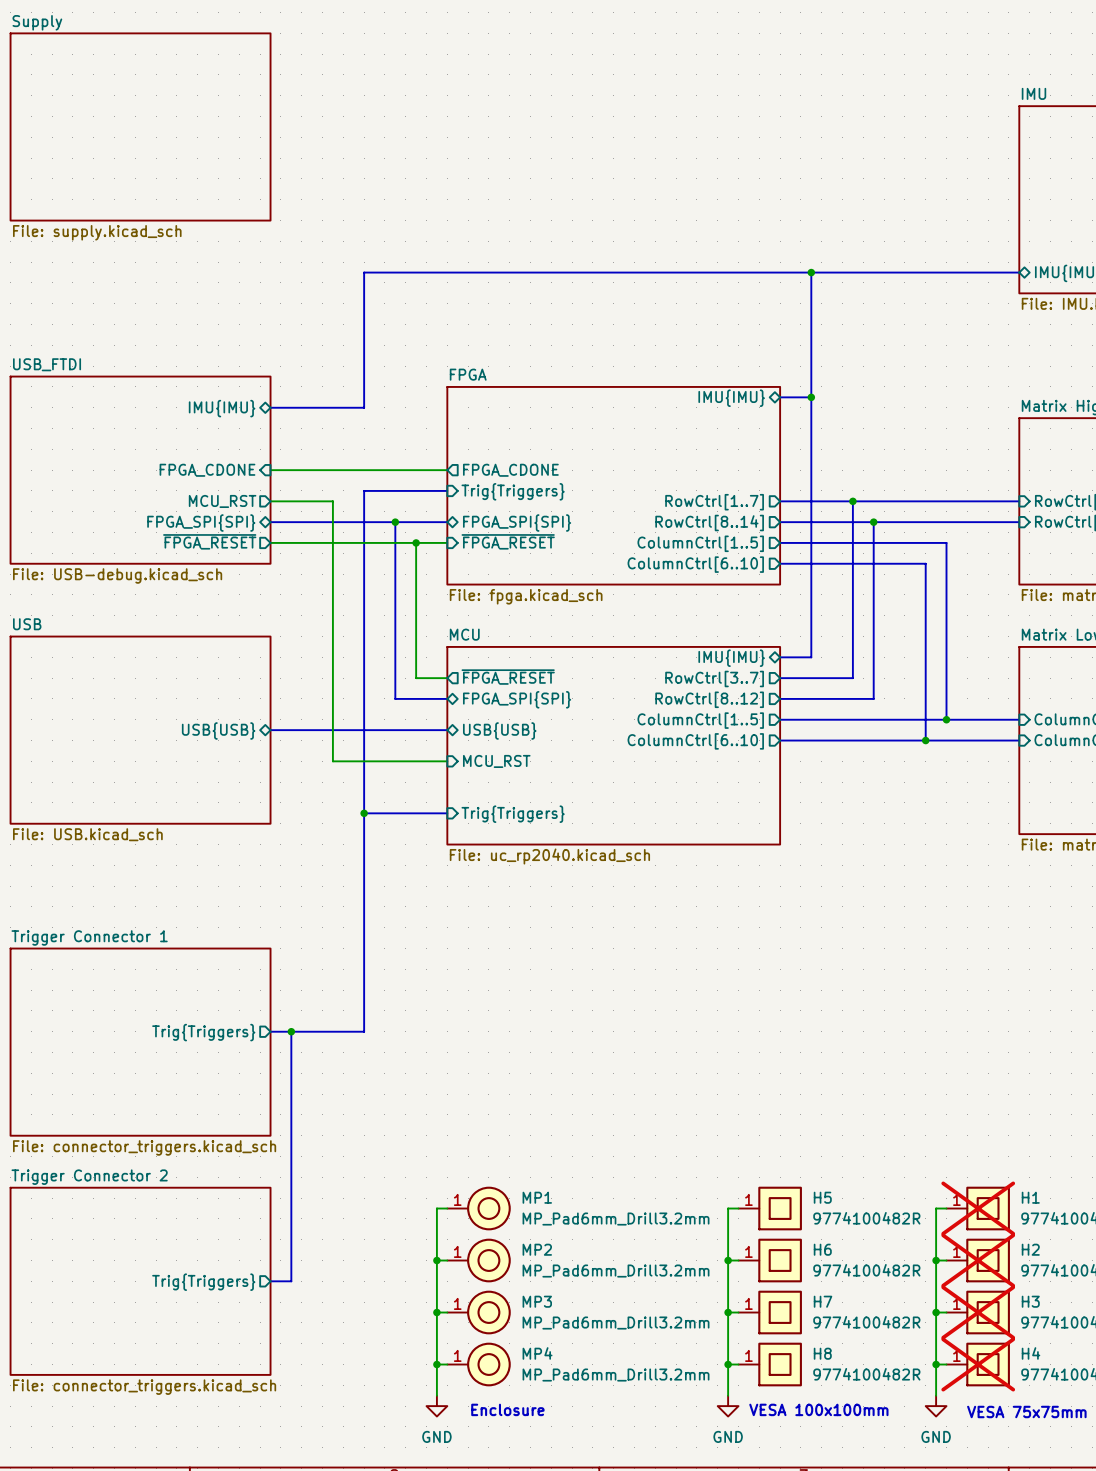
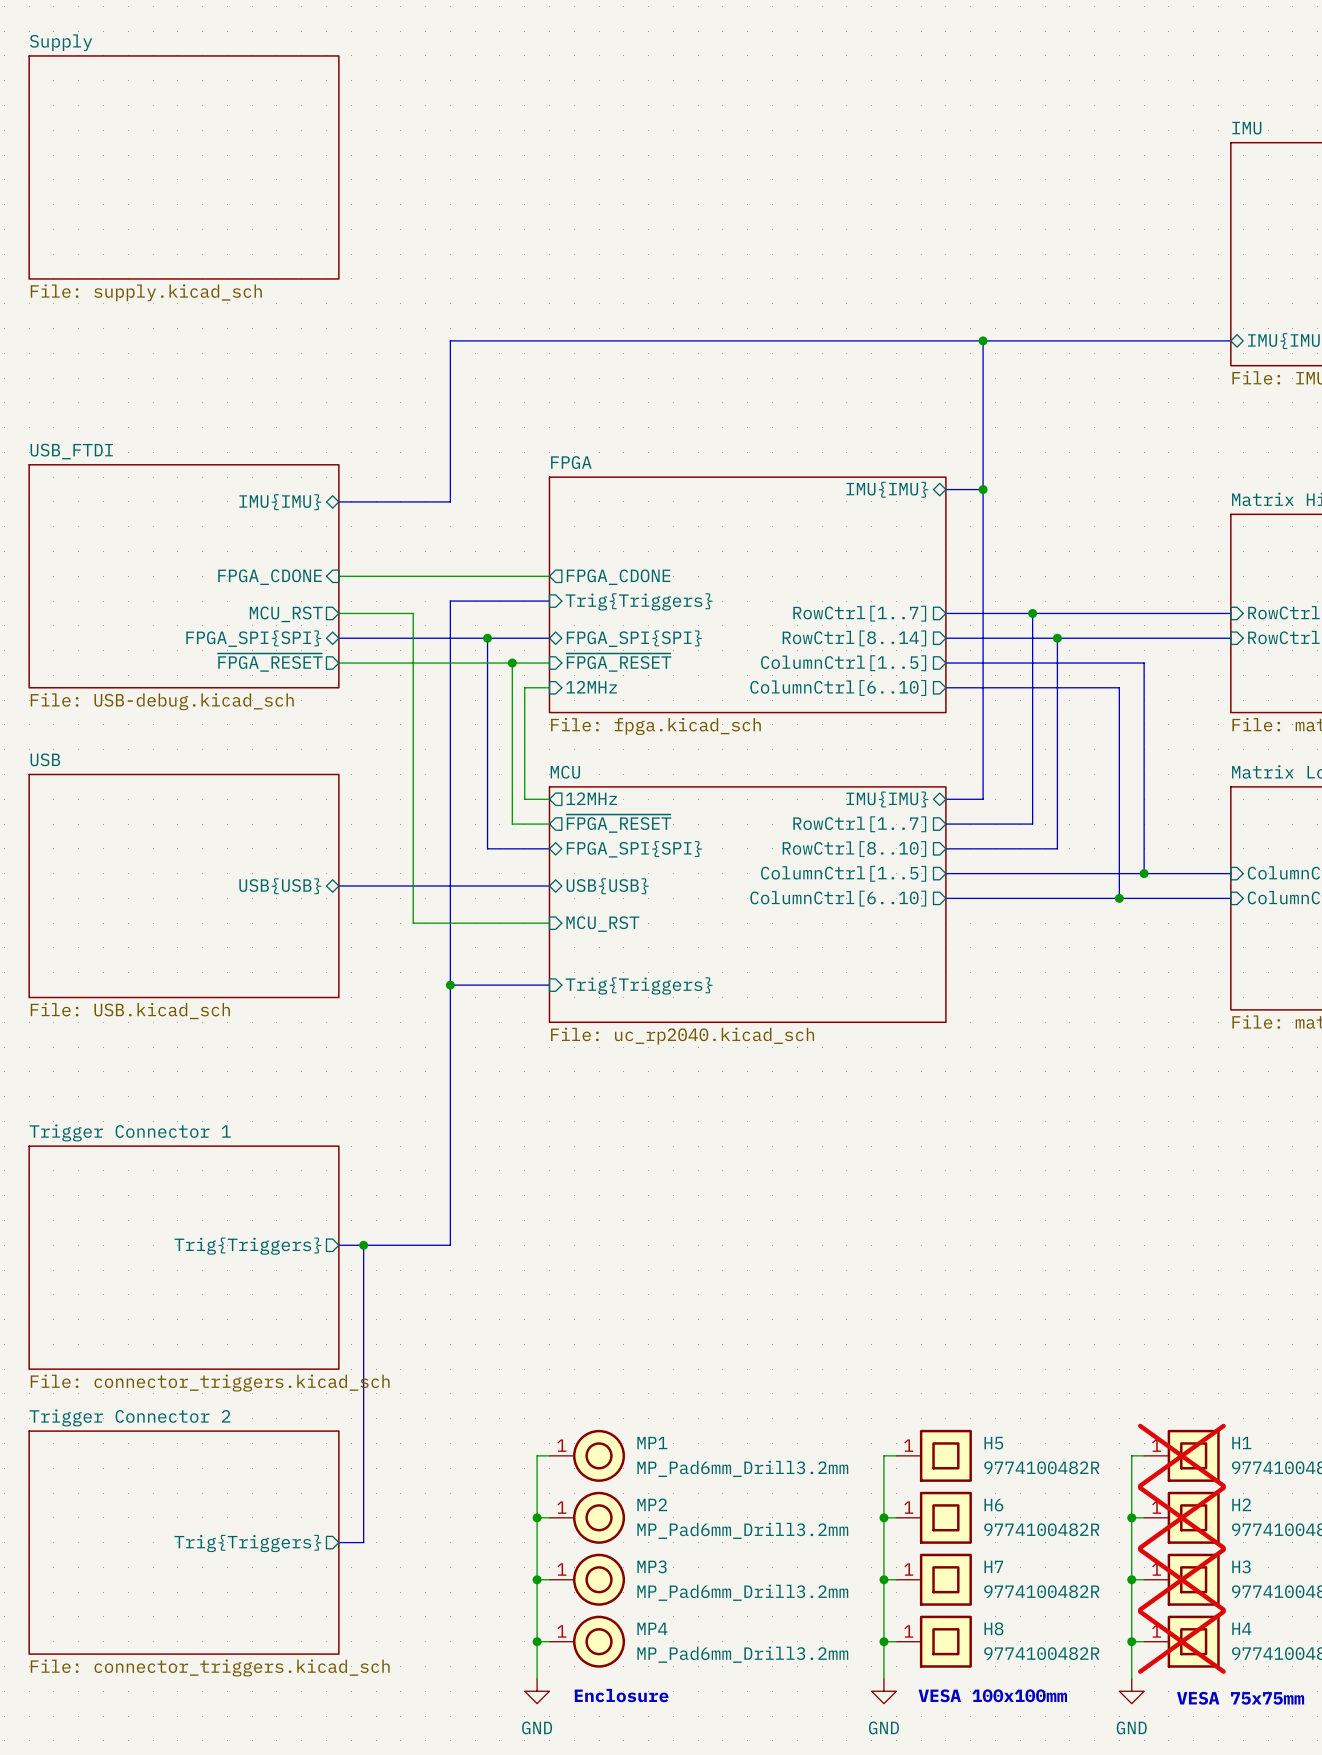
wire: none -> (549, 687) (524, 687) (524, 799) (549, 799)
sheet pin: none -> 12MHz (591, 687)
sheet pin: none -> 12MHz (591, 798)
sheet pin: RowCtrl[3..7] (714, 678) -> RowCtrl[1..7] (859, 824)
sheet pin: RowCtrl[8..12] (709, 699) -> RowCtrl[8..10] (854, 849)

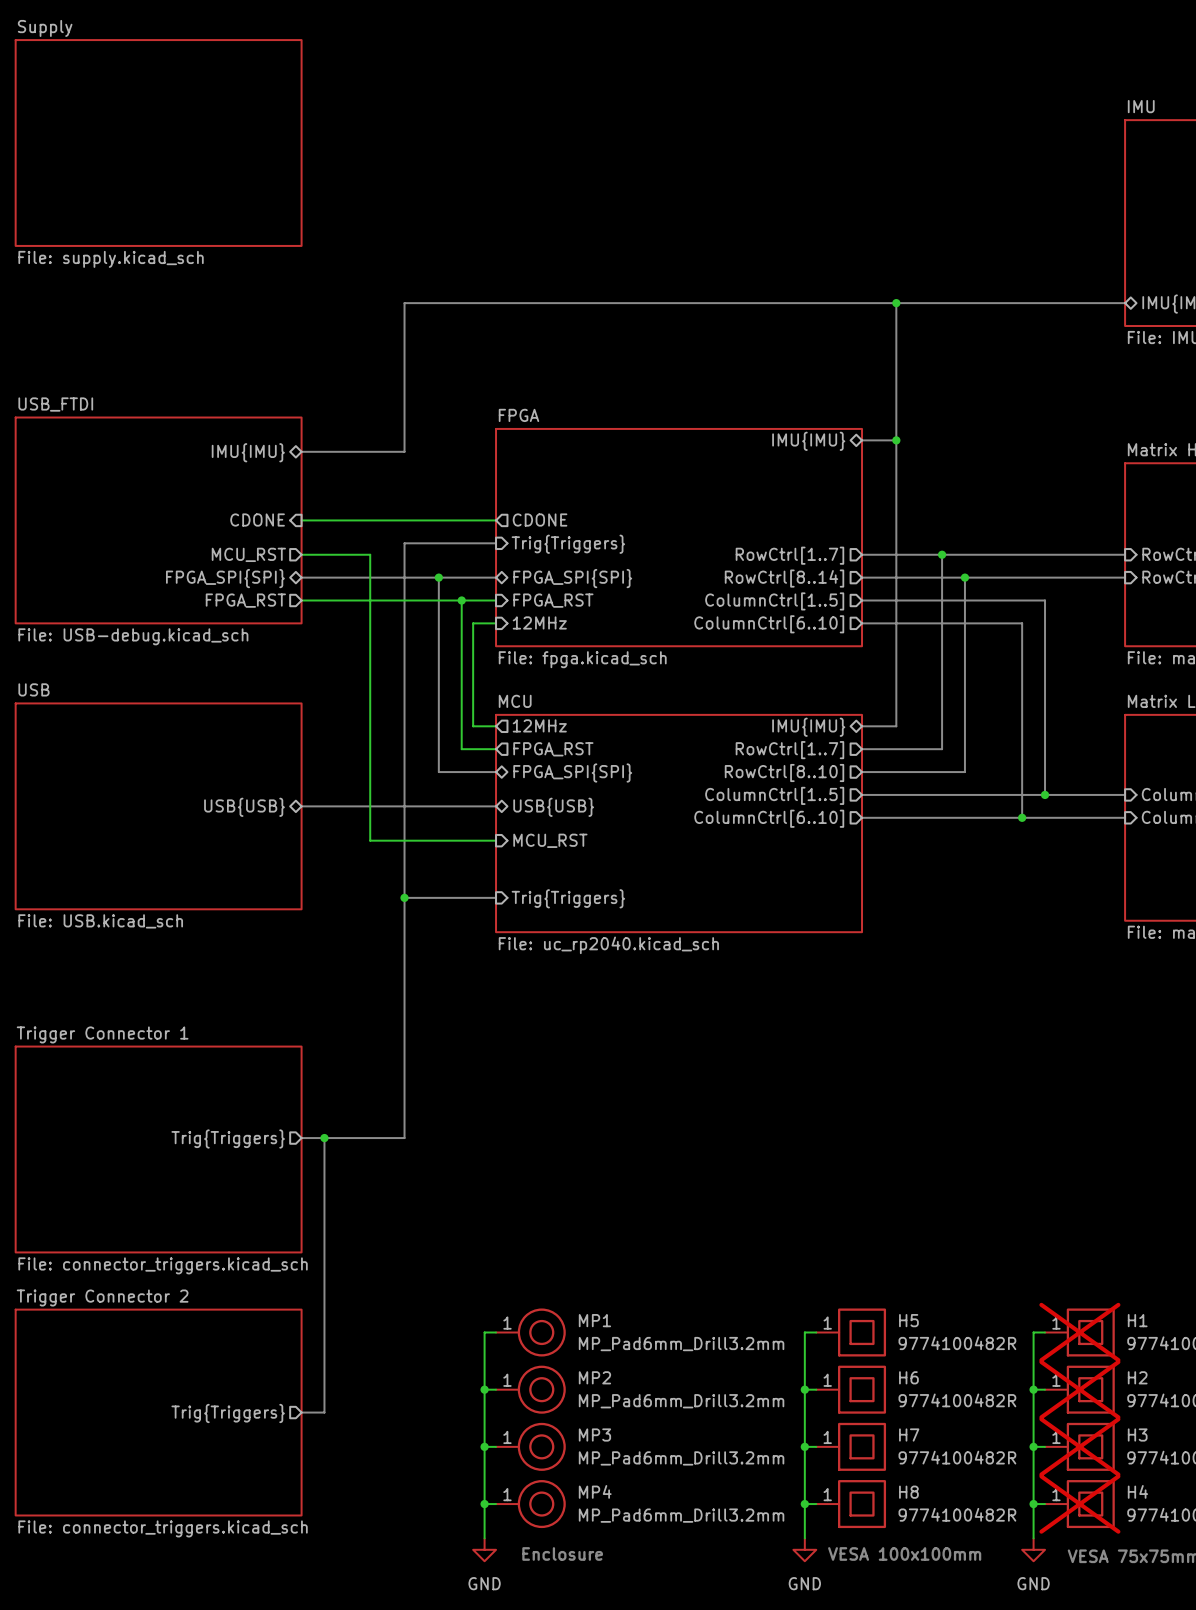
sheet pin: FPGA_CDONE (269, 577) -> CDONE (257, 520)
sheet pin: FPGA_CDONE (618, 577) -> CDONE (540, 520)
sheet pin: ~{FPGA_RESET} (270, 662) -> FPGA_RST (245, 600)
sheet pin: ~{FPGA_RESET} (618, 662) -> FPGA_RST (553, 600)
sheet pin: ~{FPGA_RESET} (618, 823) -> FPGA_RST (553, 749)

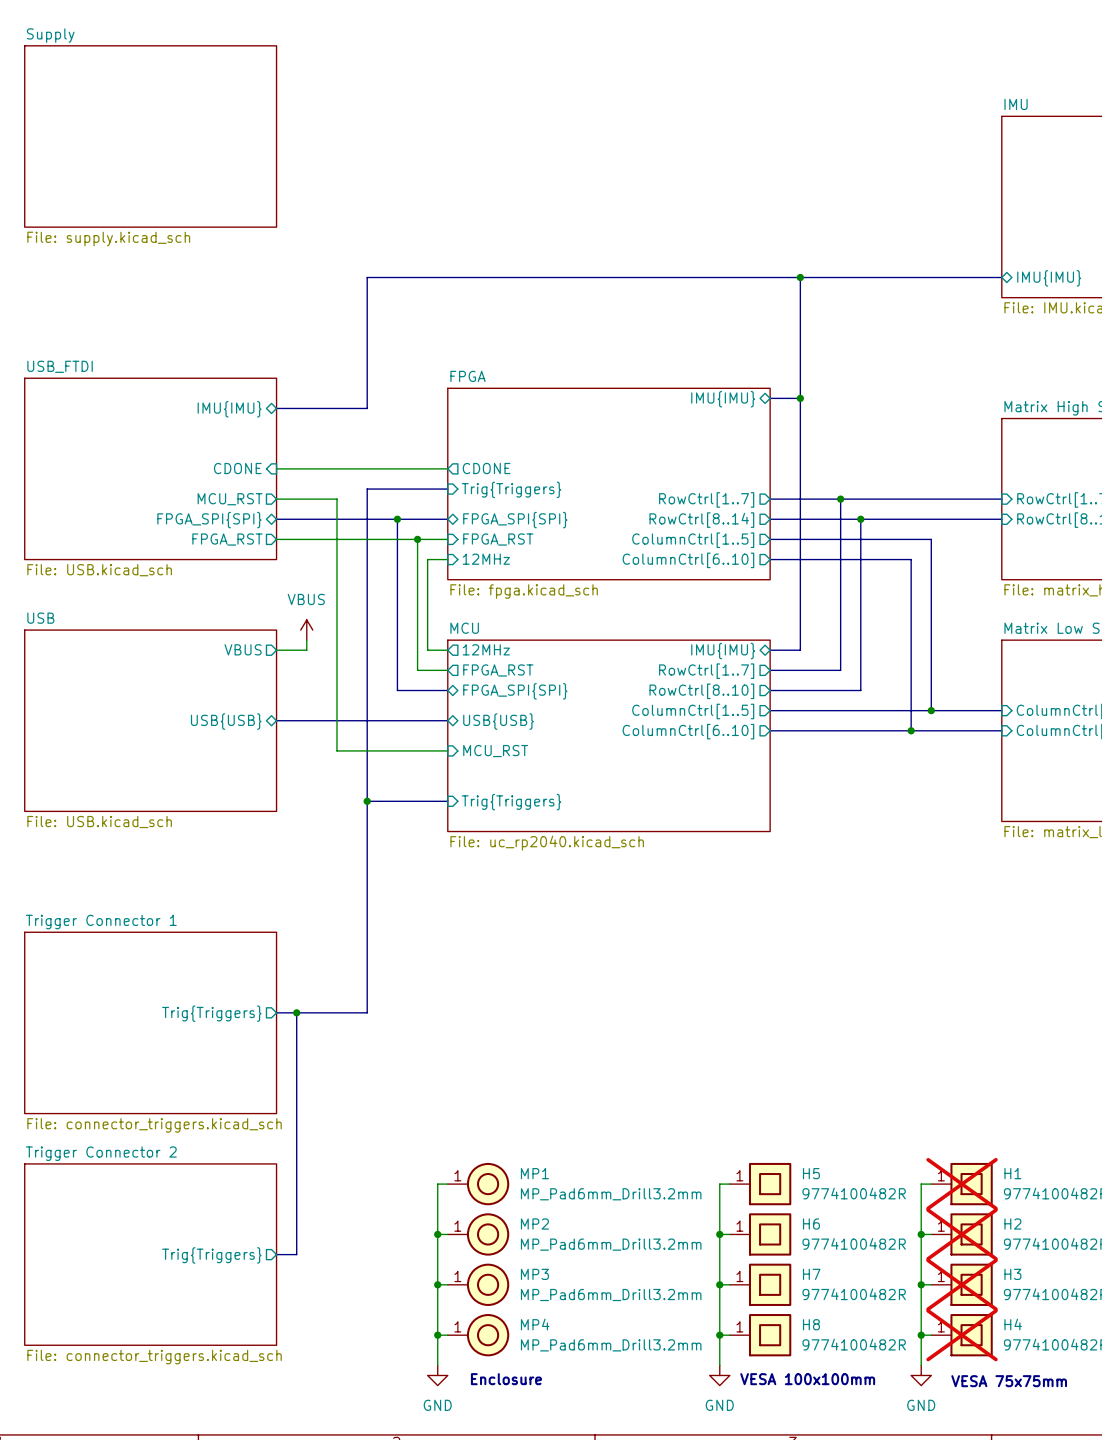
sheet USB_FTDI value: File: USB-debug.kicad_sch (133, 636) -> File: USB.kicad_sch (99, 570)
power symbol: none -> VBUS (306, 630)
wire: none -> (306, 640) (306, 650) (276, 650)
sheet pin: none -> VBUS (243, 649)

